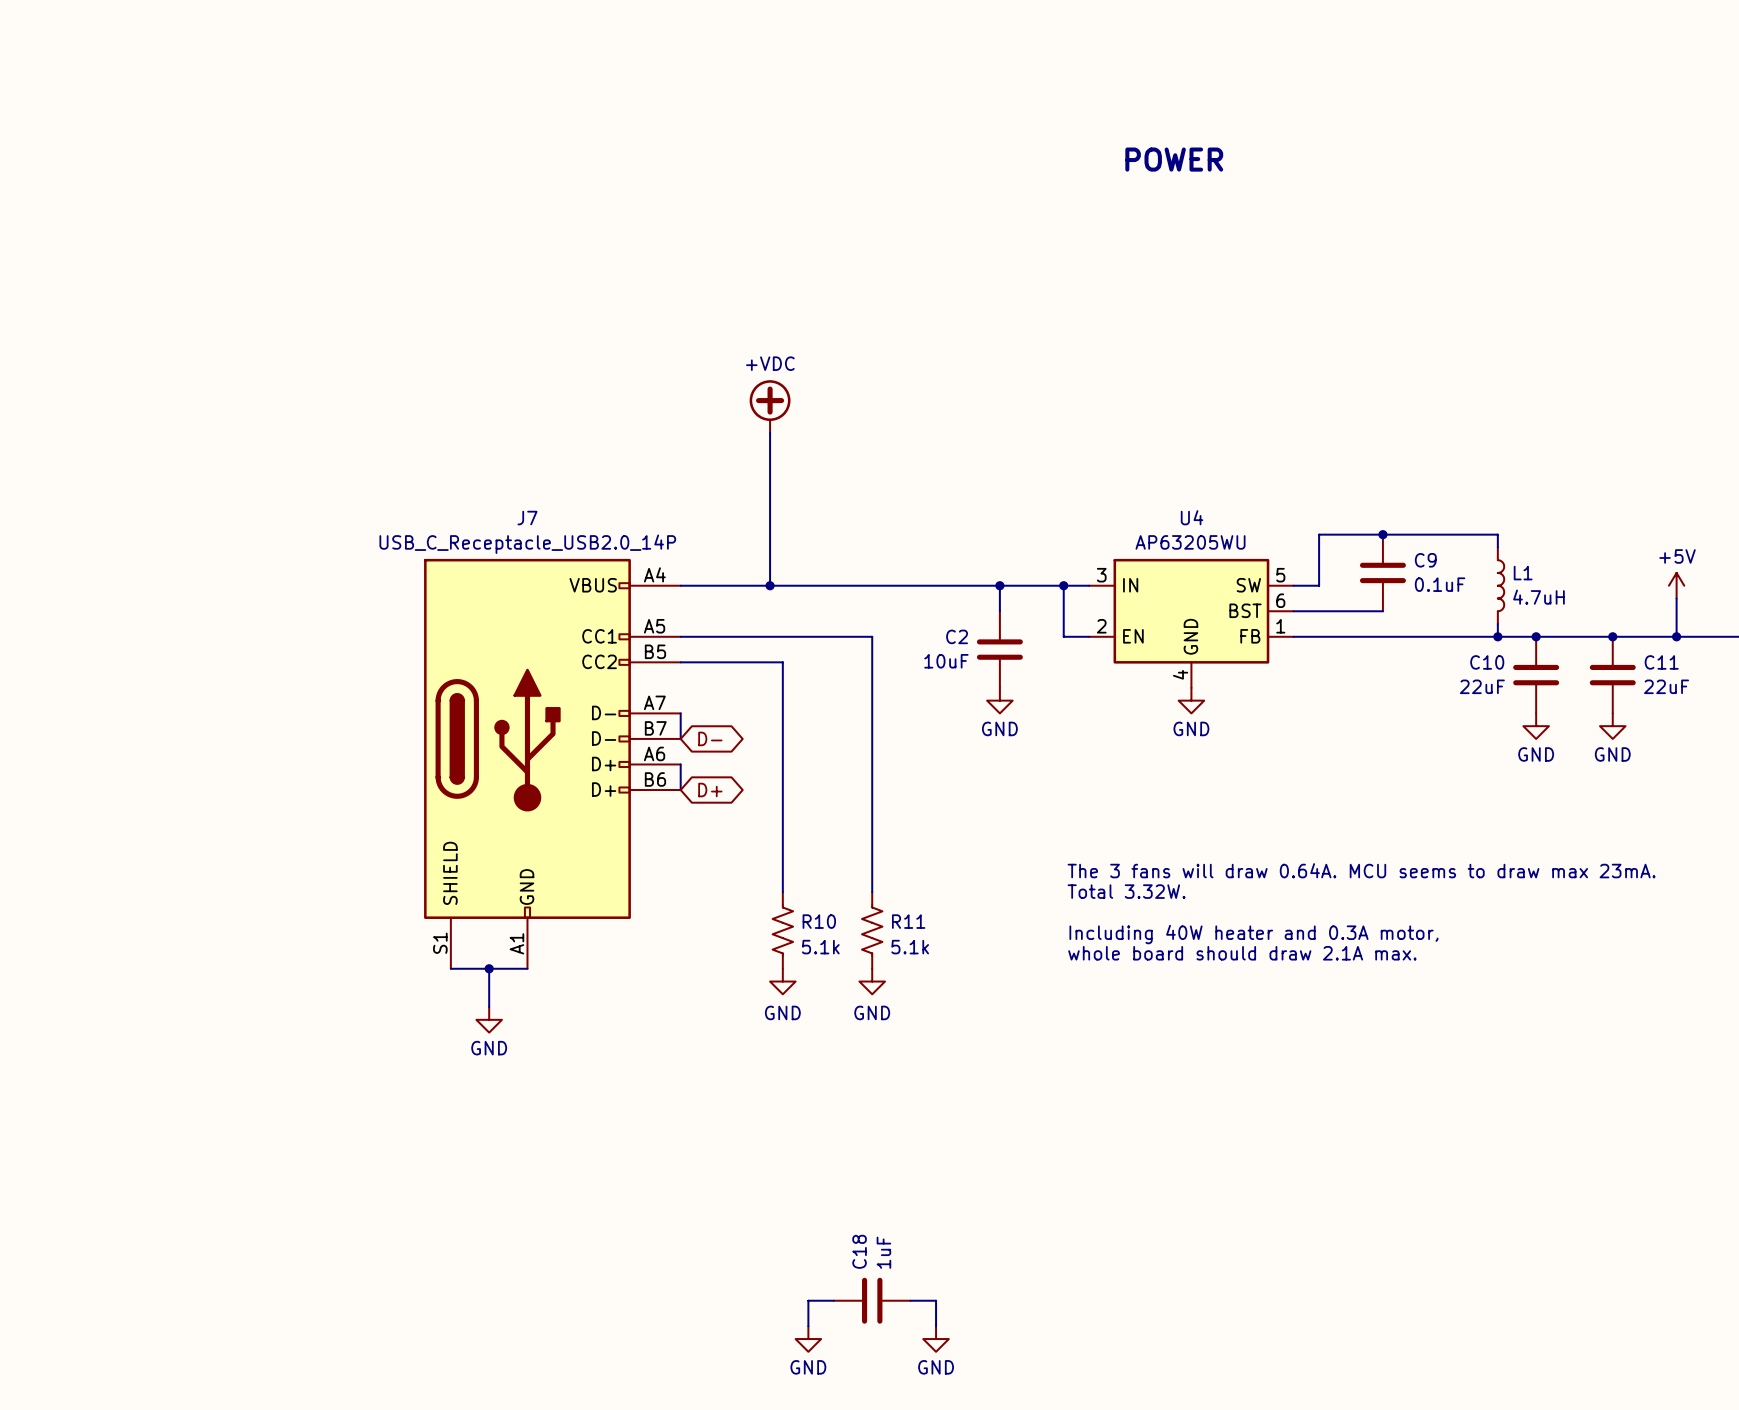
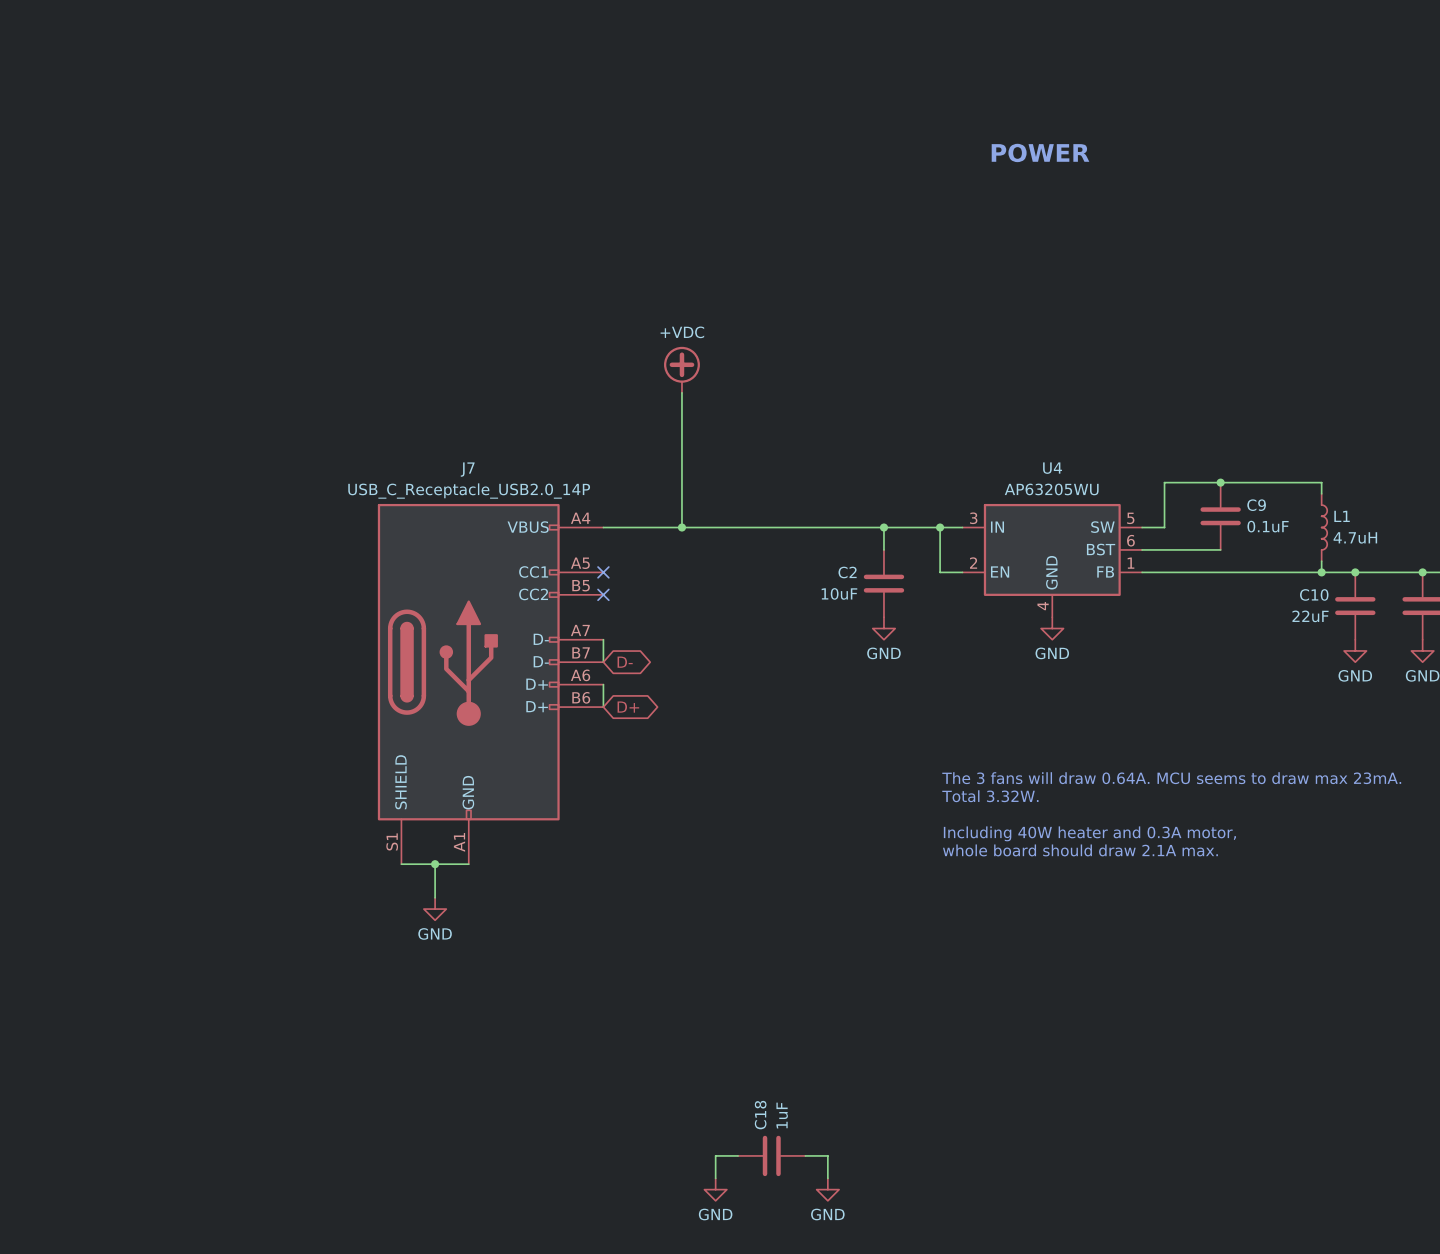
wire: (680, 636) (872, 636) (872, 892) -> none
no-connect mark: none -> (603, 572)
wire: (680, 662) (782, 662) (782, 892) -> none
no-connect mark: none -> (603, 594)
R10: 5.1k (782, 930) -> none
R11: 5.1k (872, 930) -> none
power symbol: GND (782, 981) -> none
power symbol: GND (872, 981) -> none

